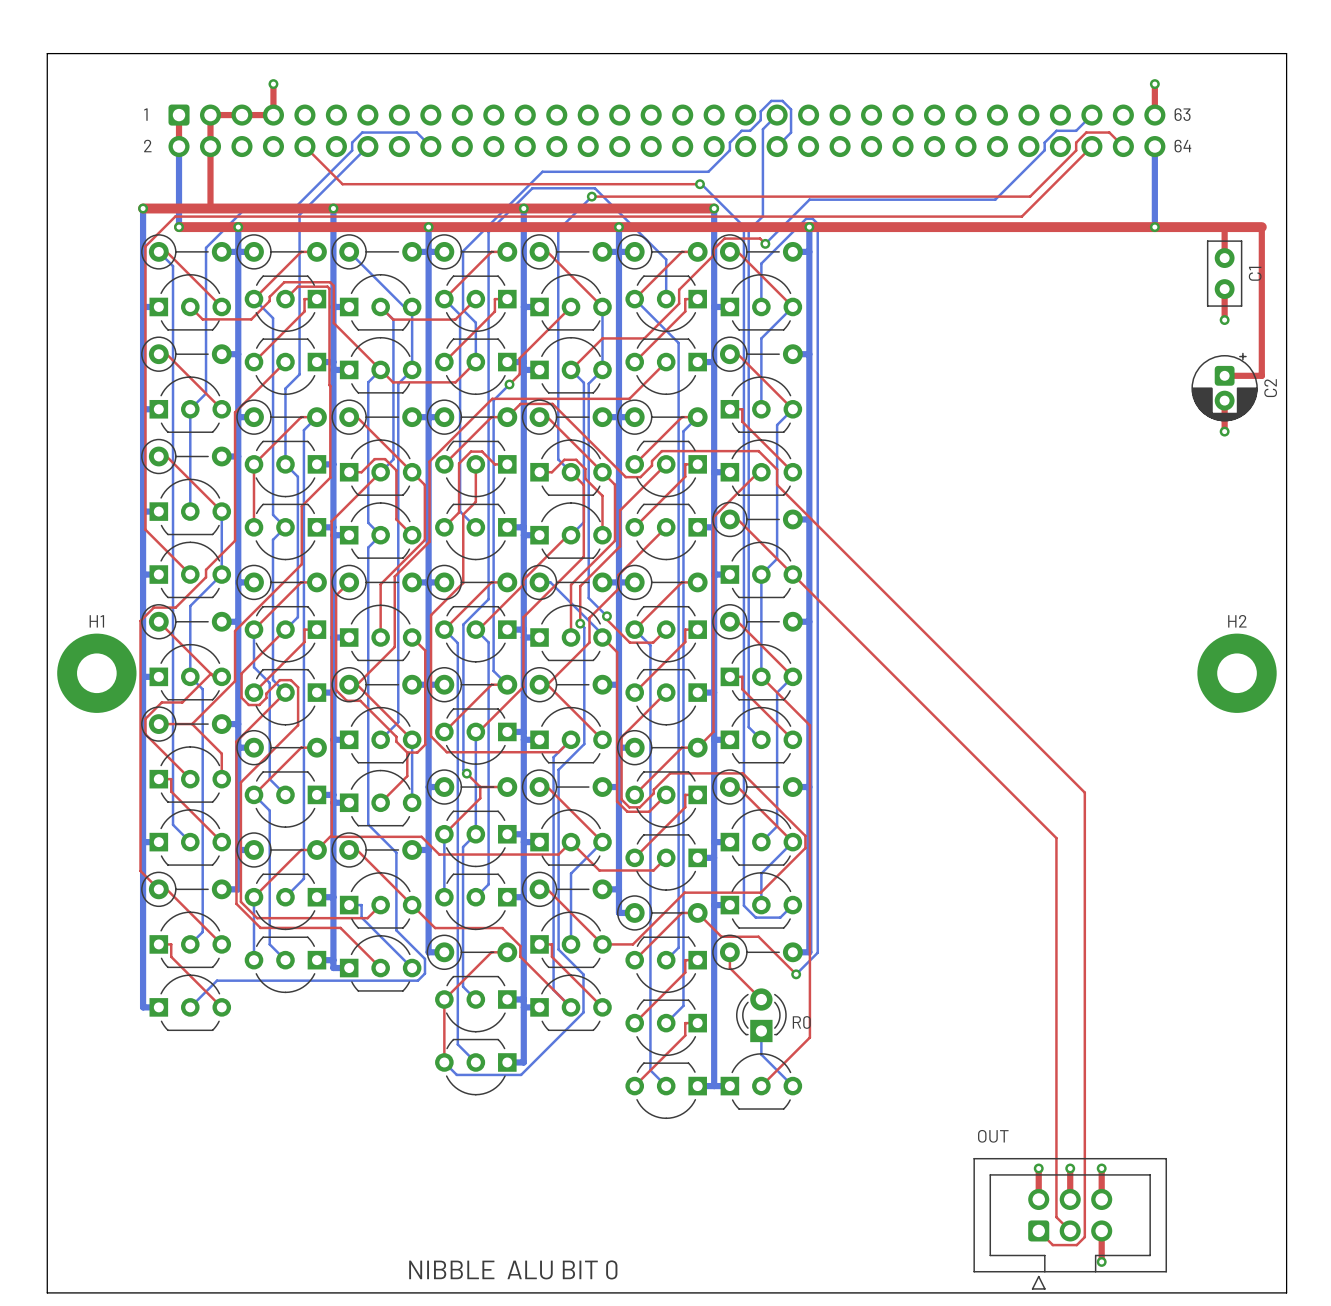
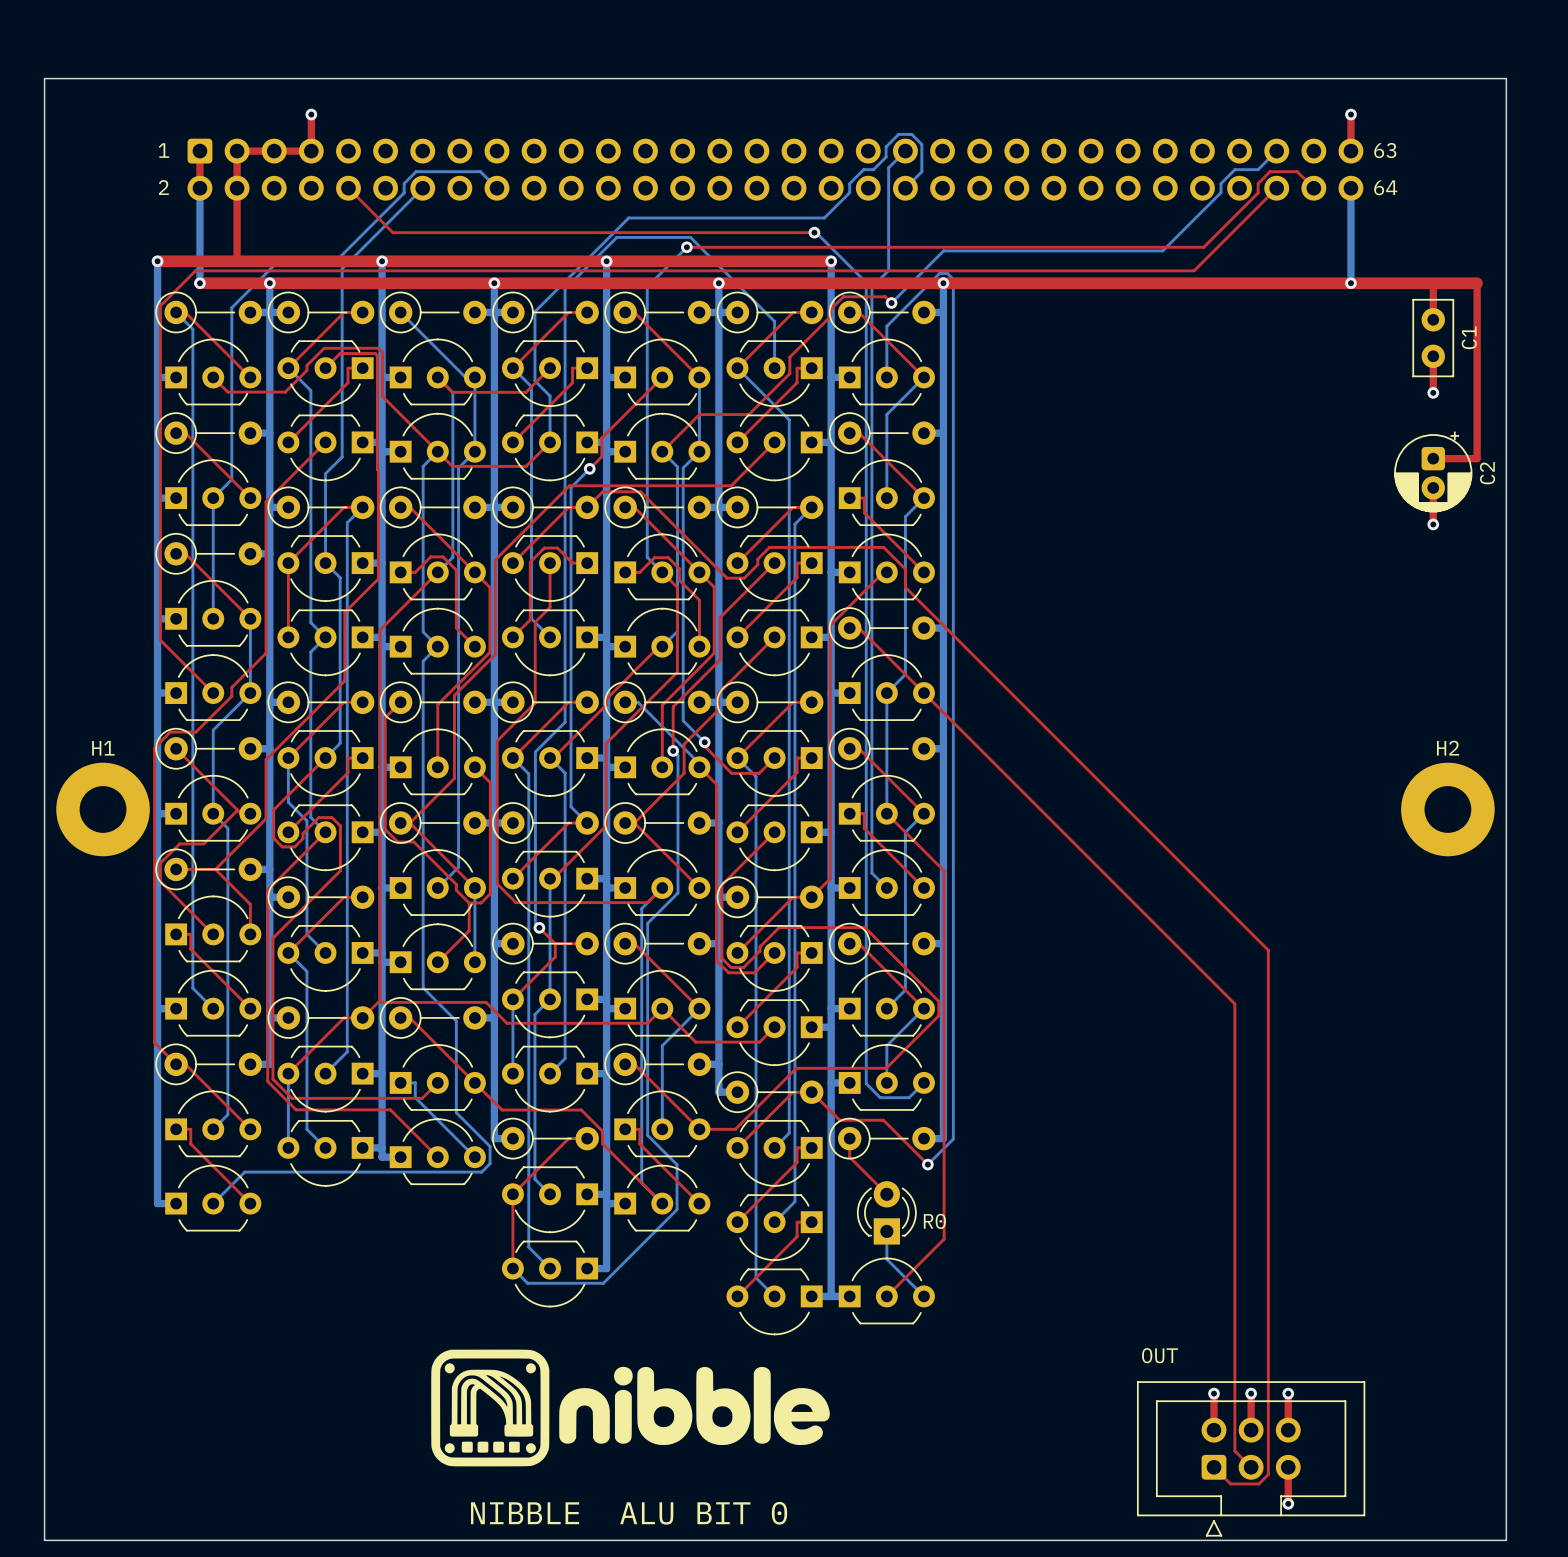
drawing: none -> [431, 1349, 830, 1467]

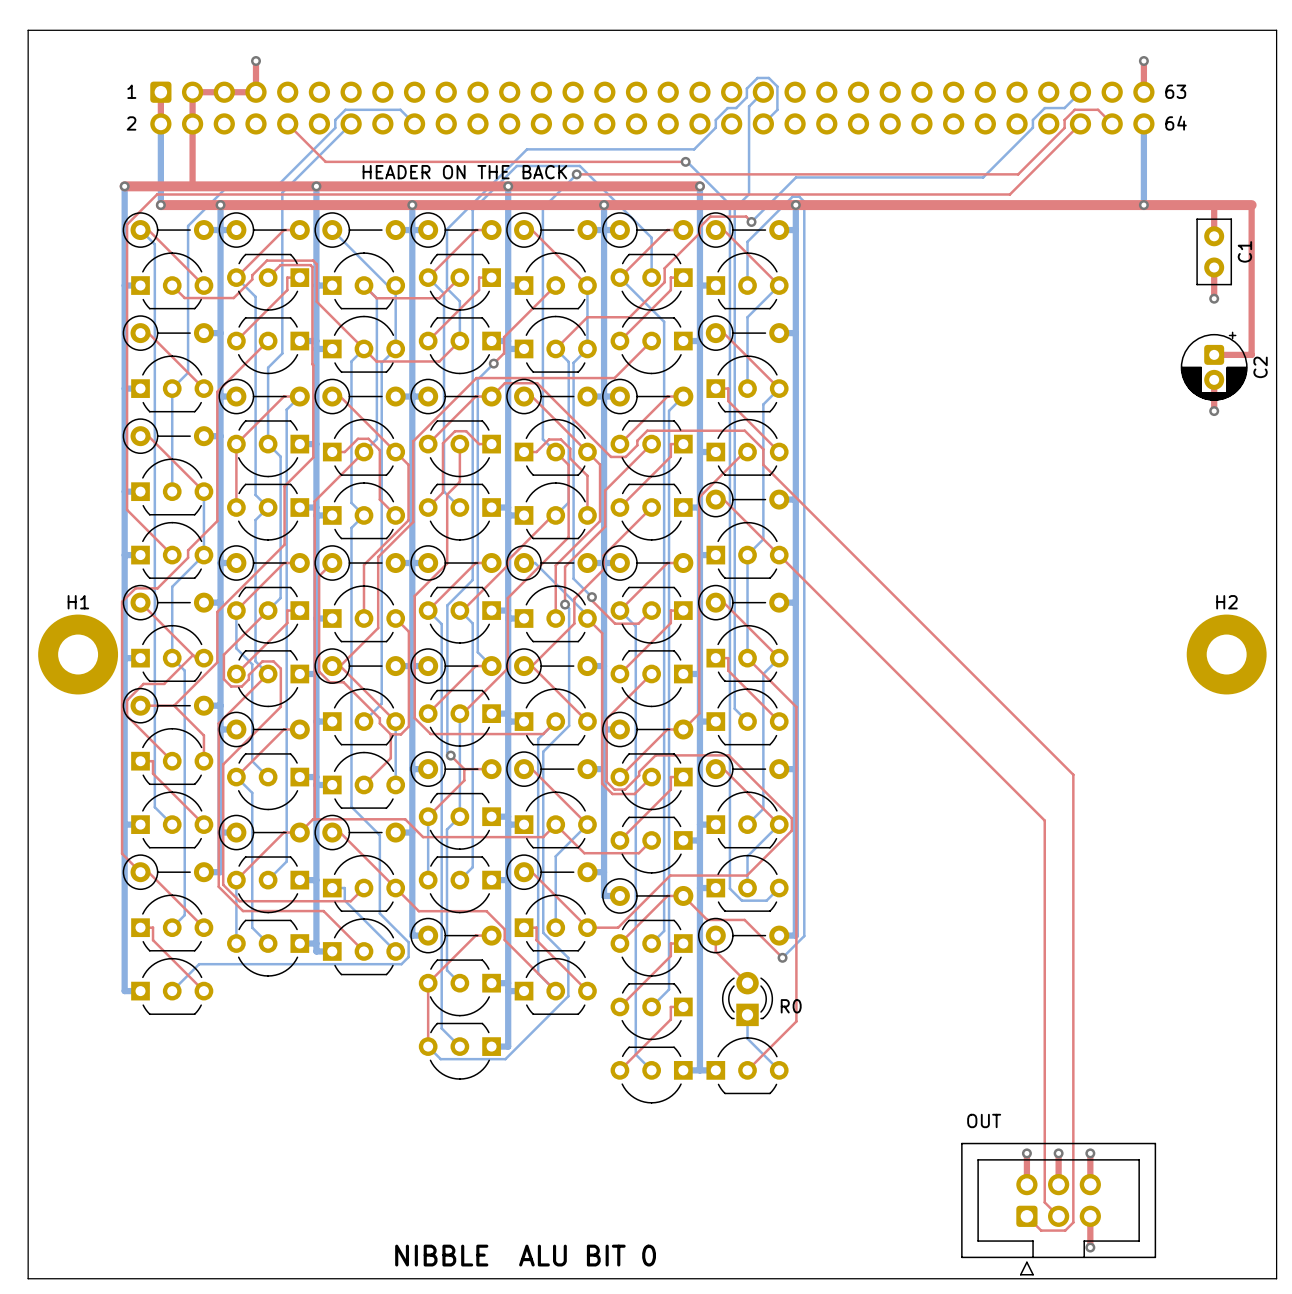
text: none -> HEADER ON THE BACK (464, 172)
drawing: [431, 1349, 830, 1467] -> none

